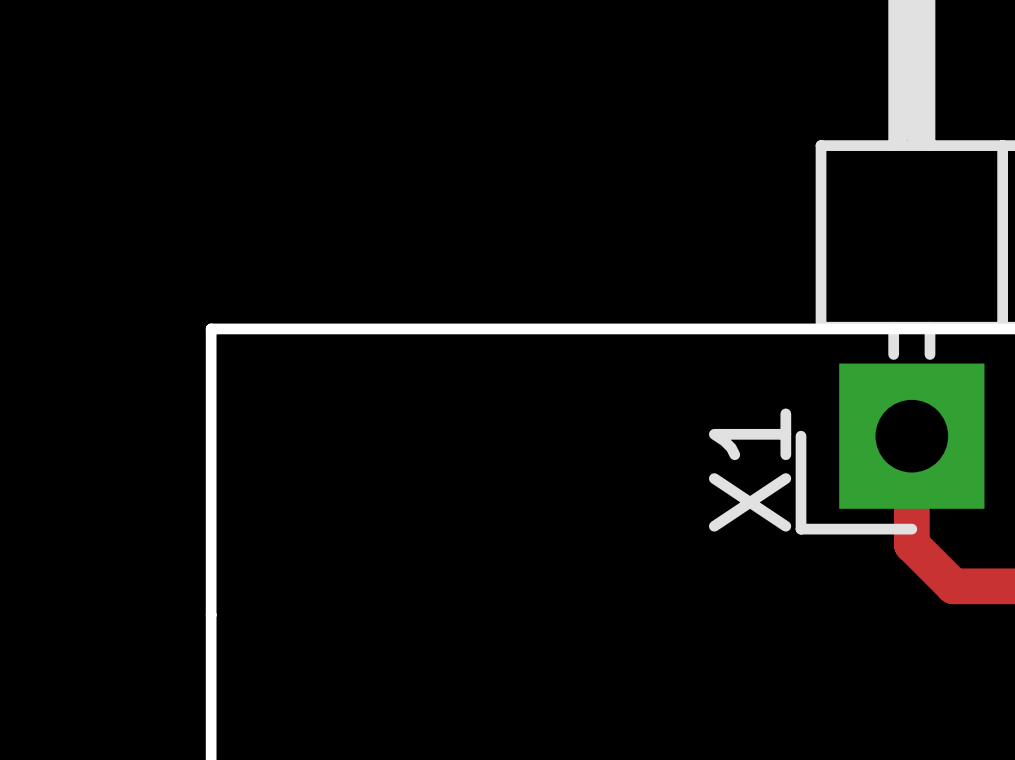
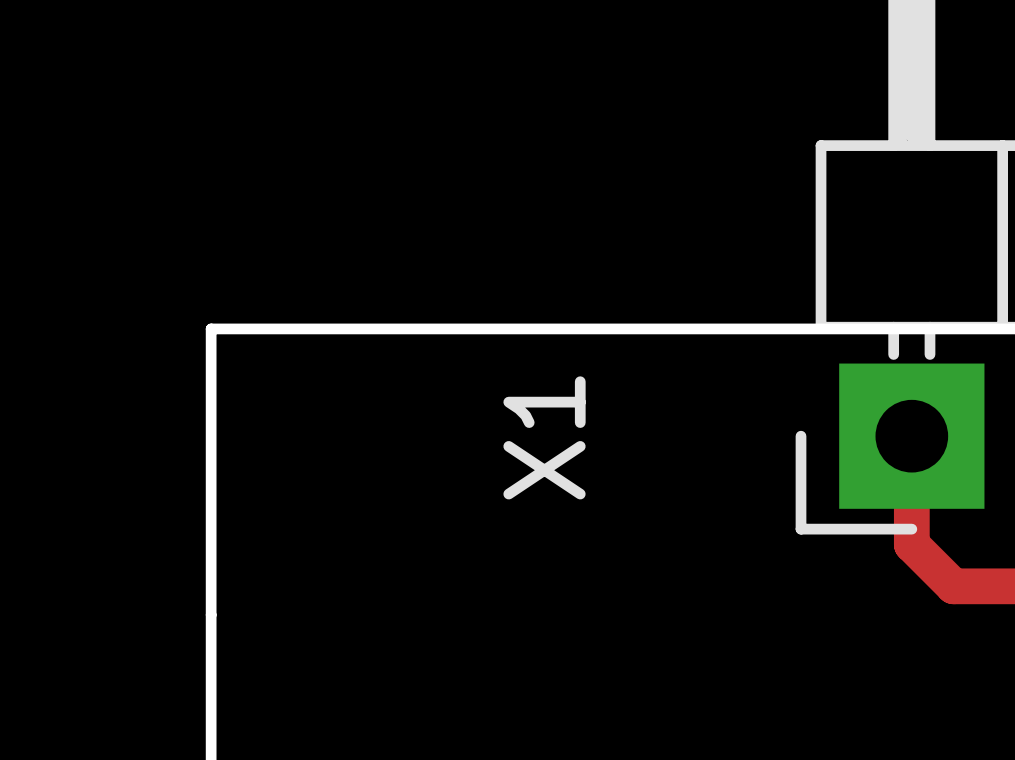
X1 name position: X1 (750, 470) -> X1 (544, 437)

